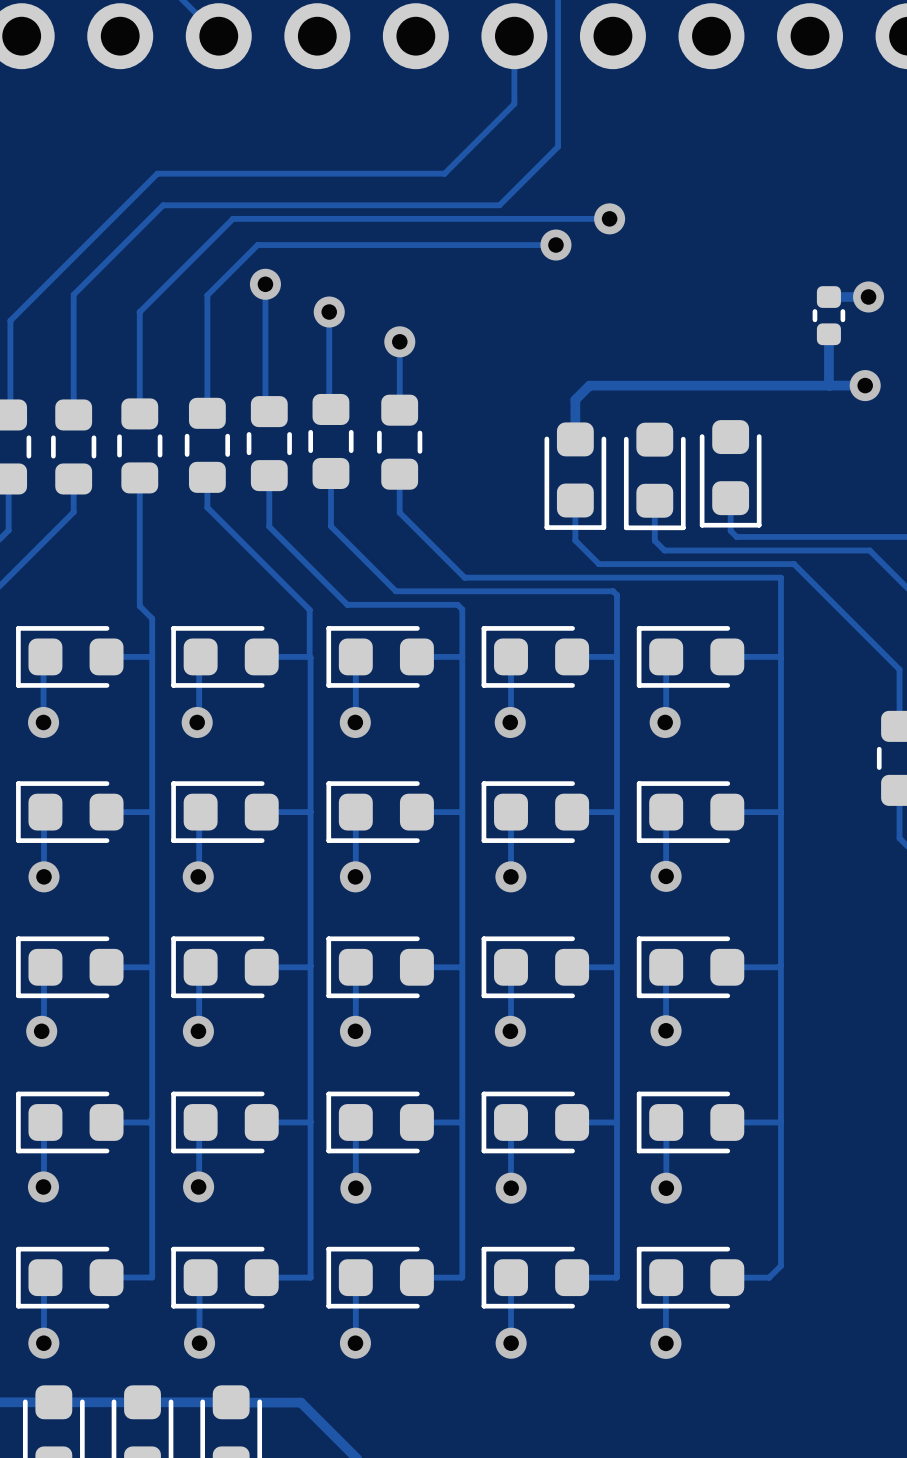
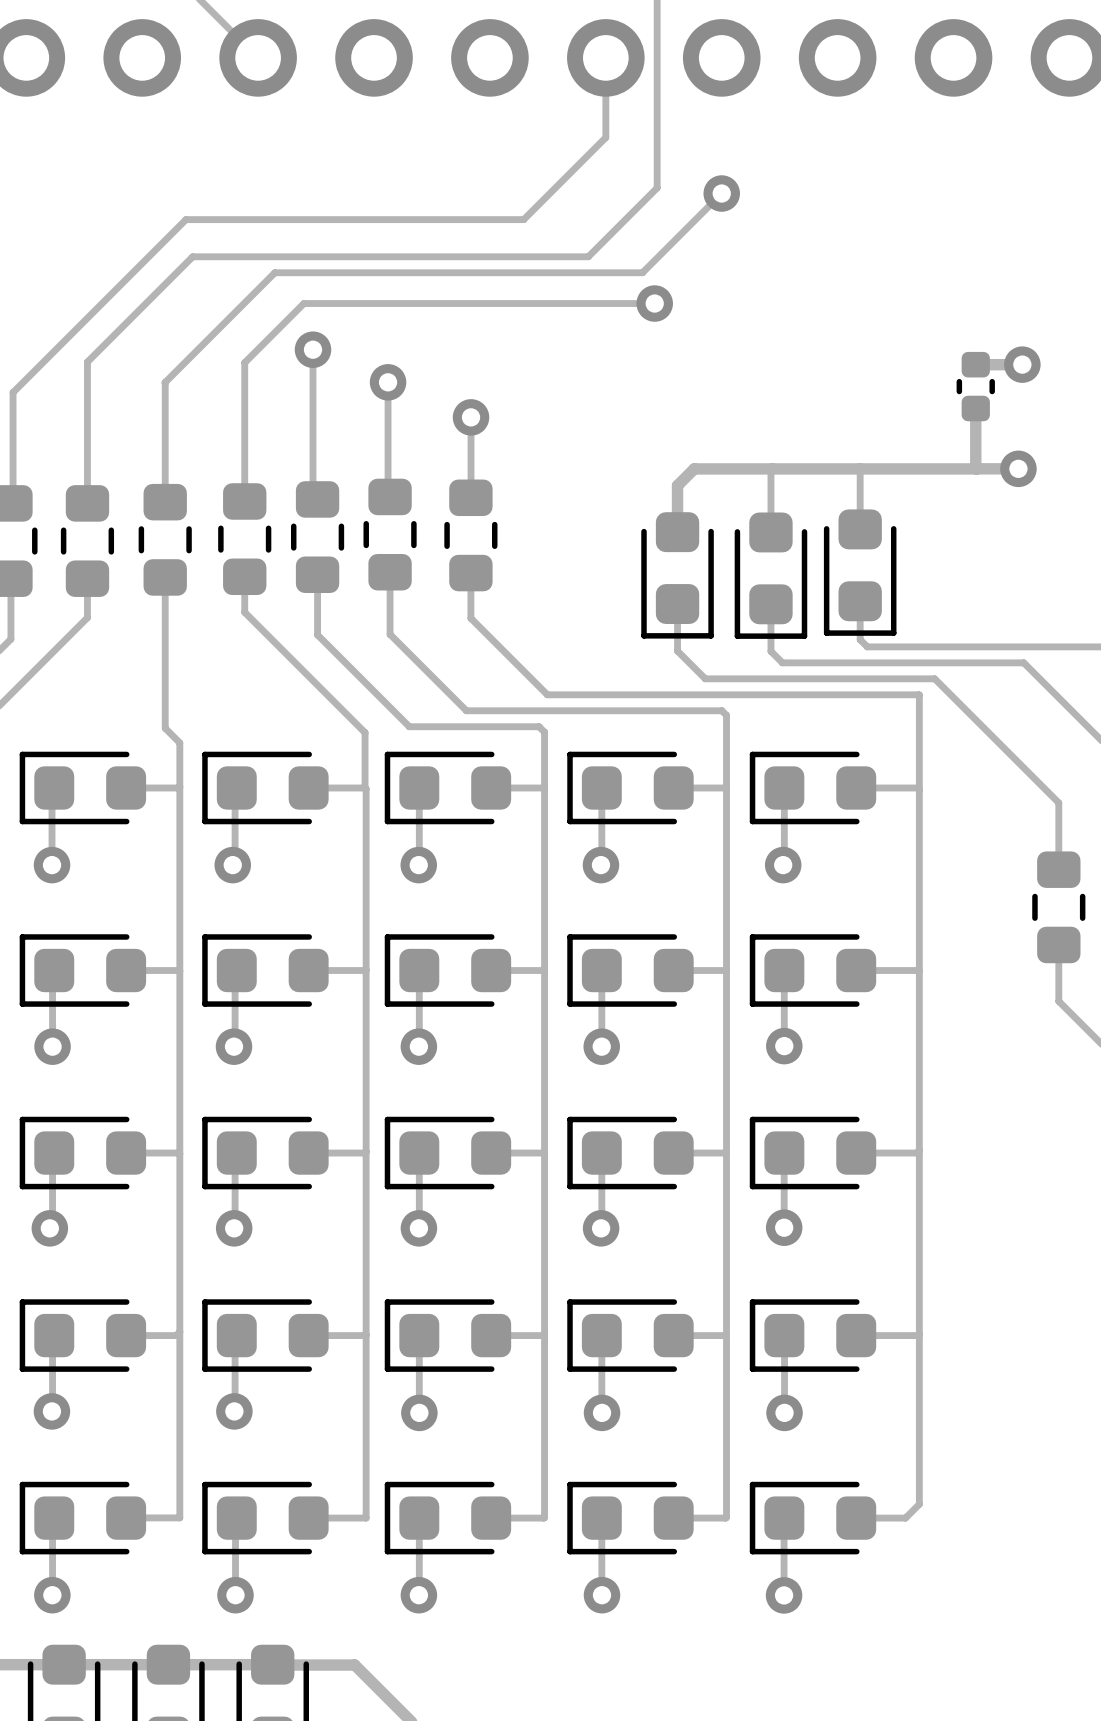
track: (545, 218) (609, 218) -> (642, 272) (721, 193)
via position: (609, 218) -> (721, 193)
track: none -> (772, 468) (770, 532)
track: none -> (860, 469) (860, 529)

